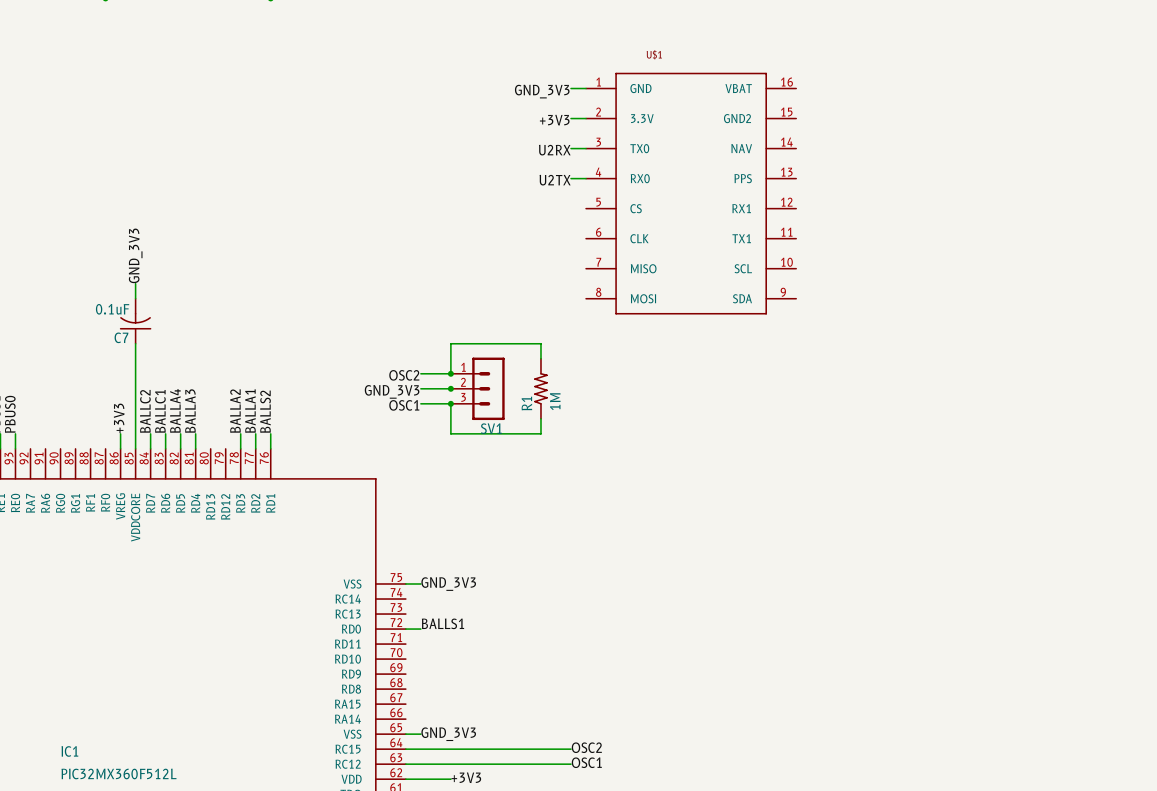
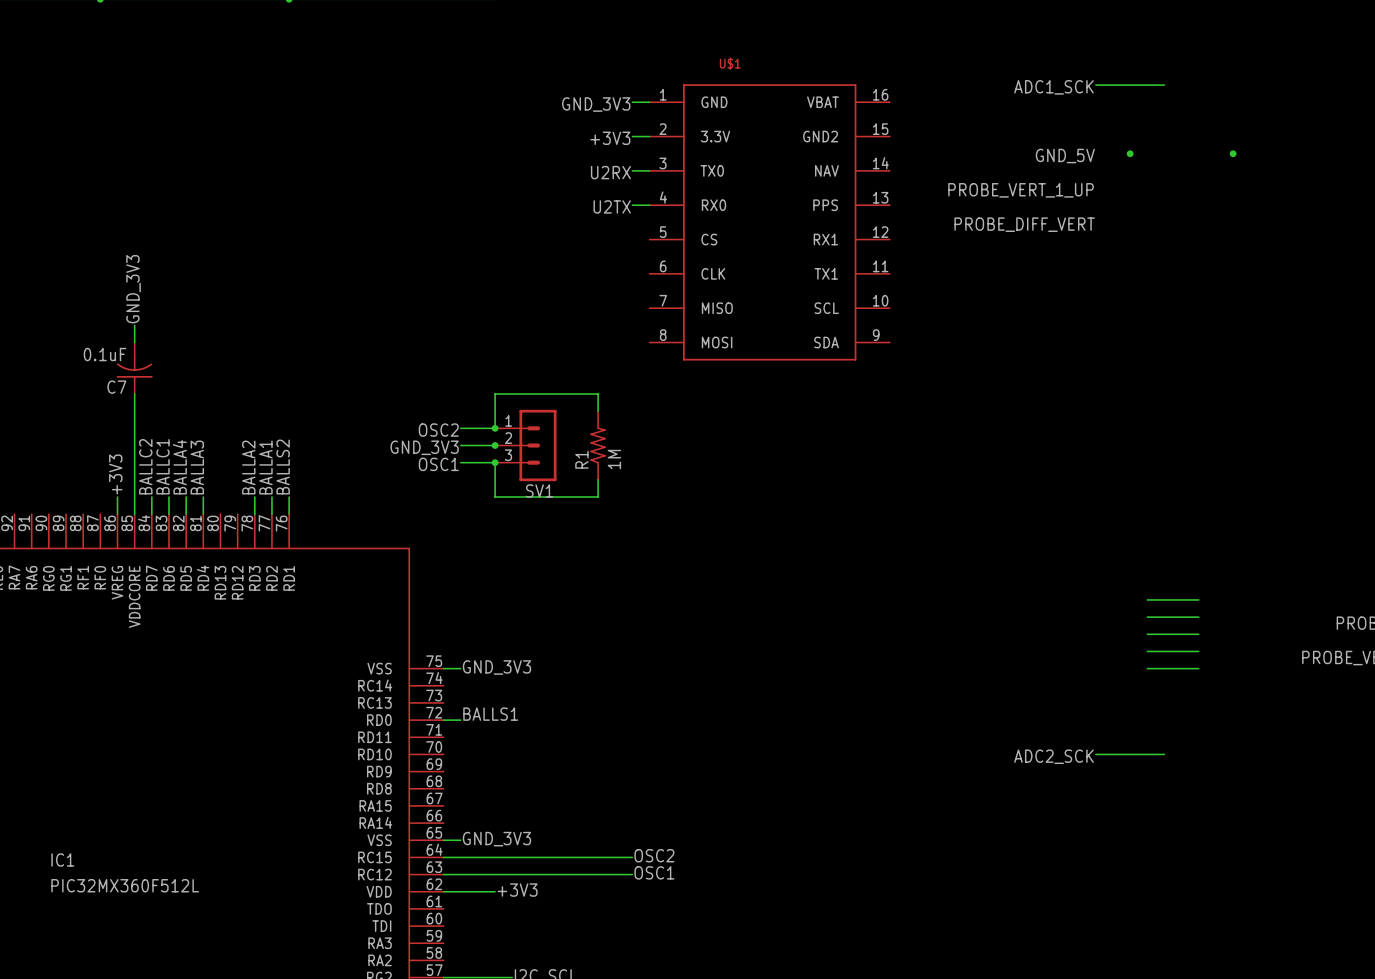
wire: none -> (1095, 85) (1164, 85)
label: none -> ADC1_SCK (1053, 87)
junction: none -> (1130, 153)
junction: none -> (1233, 153)
label: none -> GND_5V (1065, 156)
label: none -> PROBE_VERT_1_UP (1021, 190)
label: none -> PROBE_DIFF_VERT (1024, 224)
wire: none -> (1147, 599) (1198, 599)
wire: none -> (1147, 617) (1198, 617)
wire: none -> (1147, 634) (1198, 634)
wire: none -> (1147, 651) (1198, 651)
wire: none -> (1147, 668) (1198, 668)
wire: none -> (1095, 754) (1164, 754)
label: none -> ADC2_SCK (1053, 756)

